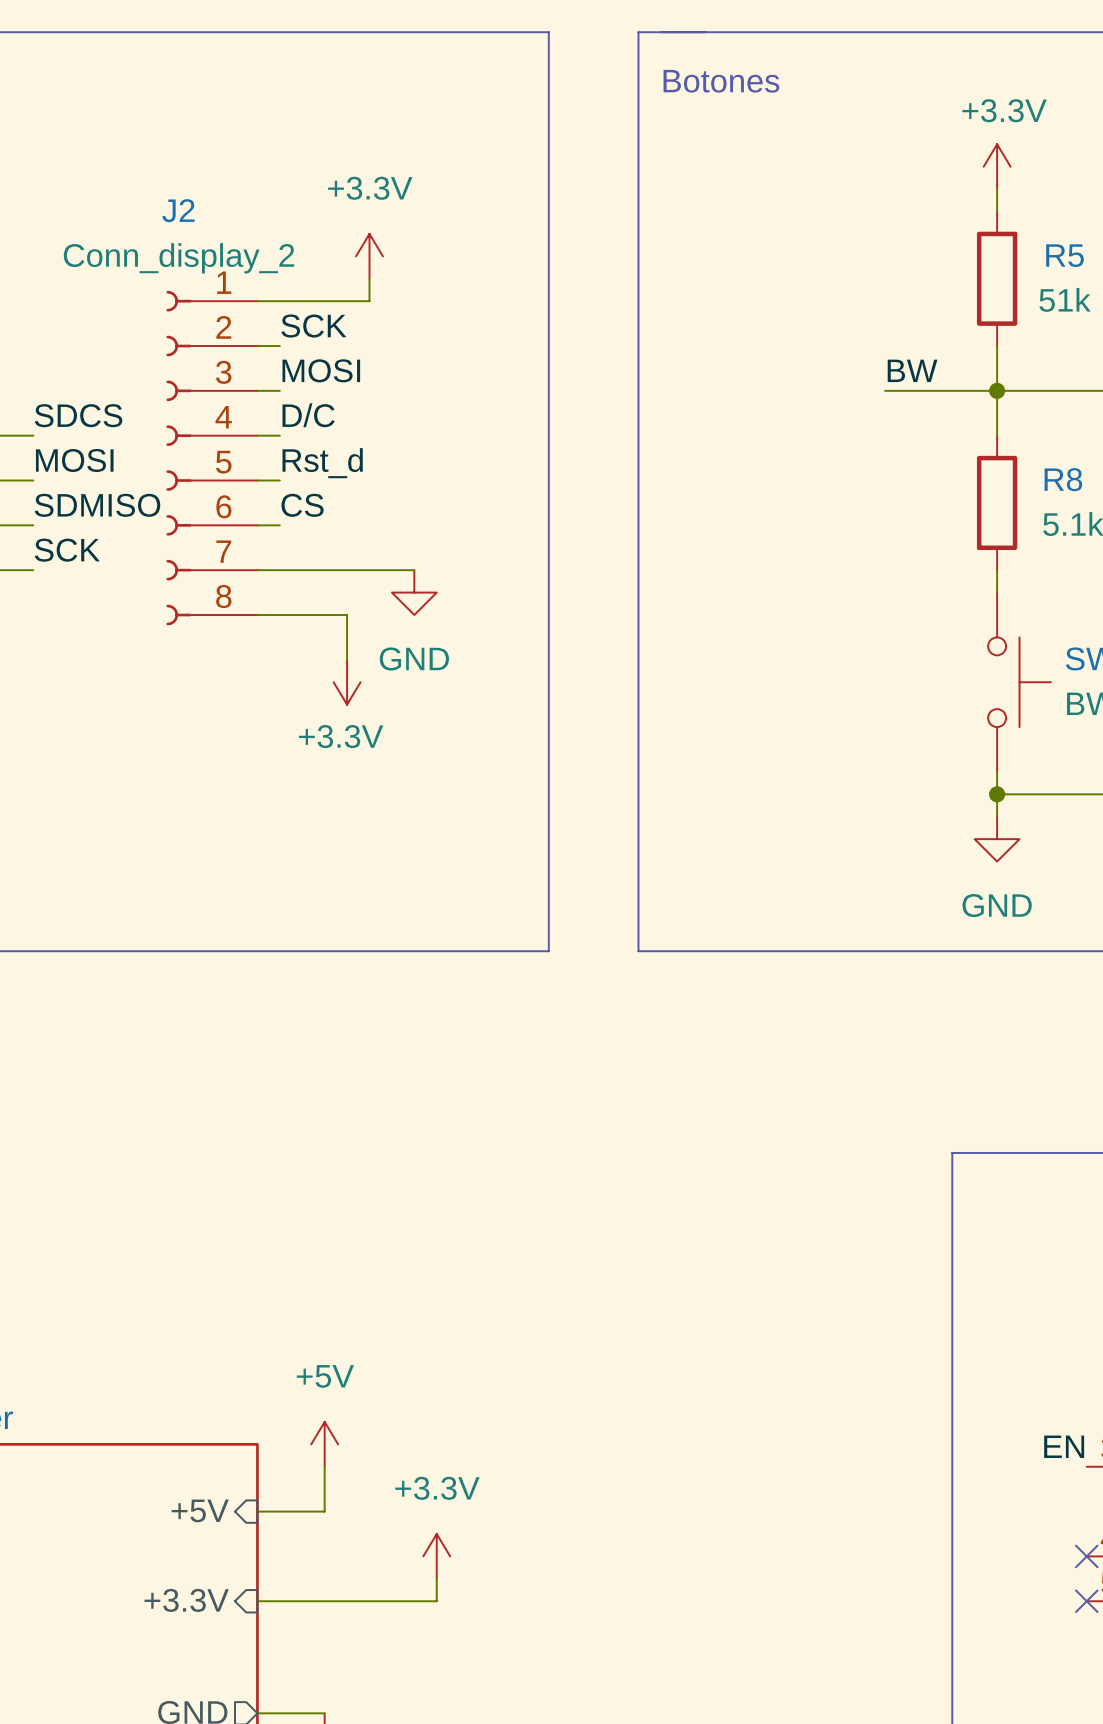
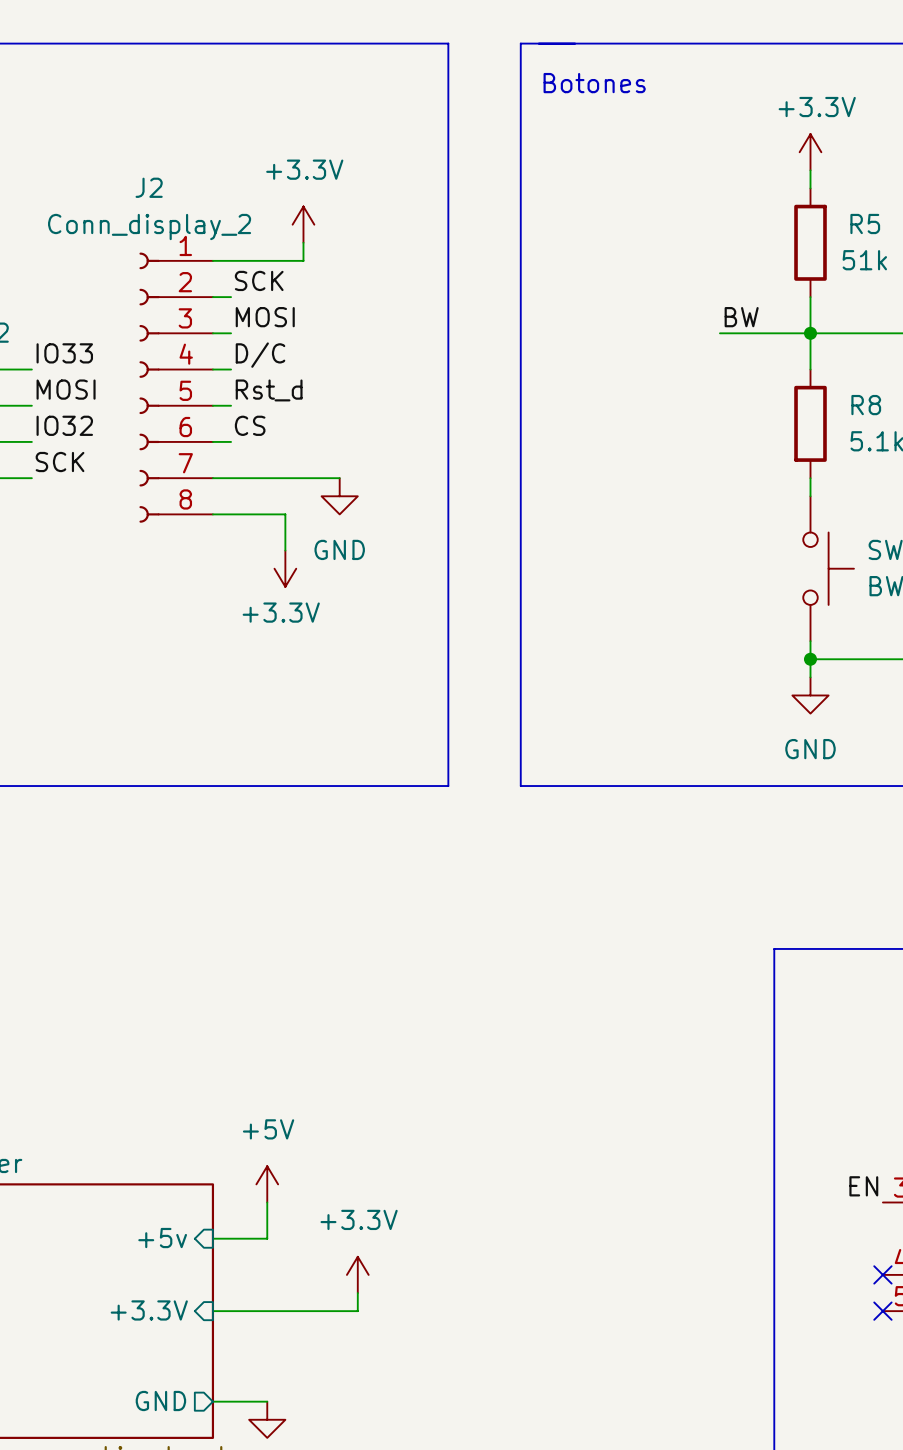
label: SDCS (78, 415) -> IO33 (64, 353)
label: SDMISO (97, 505) -> IO32 (64, 425)
sheet pin: +5V (200, 1510) -> +5v (162, 1238)

